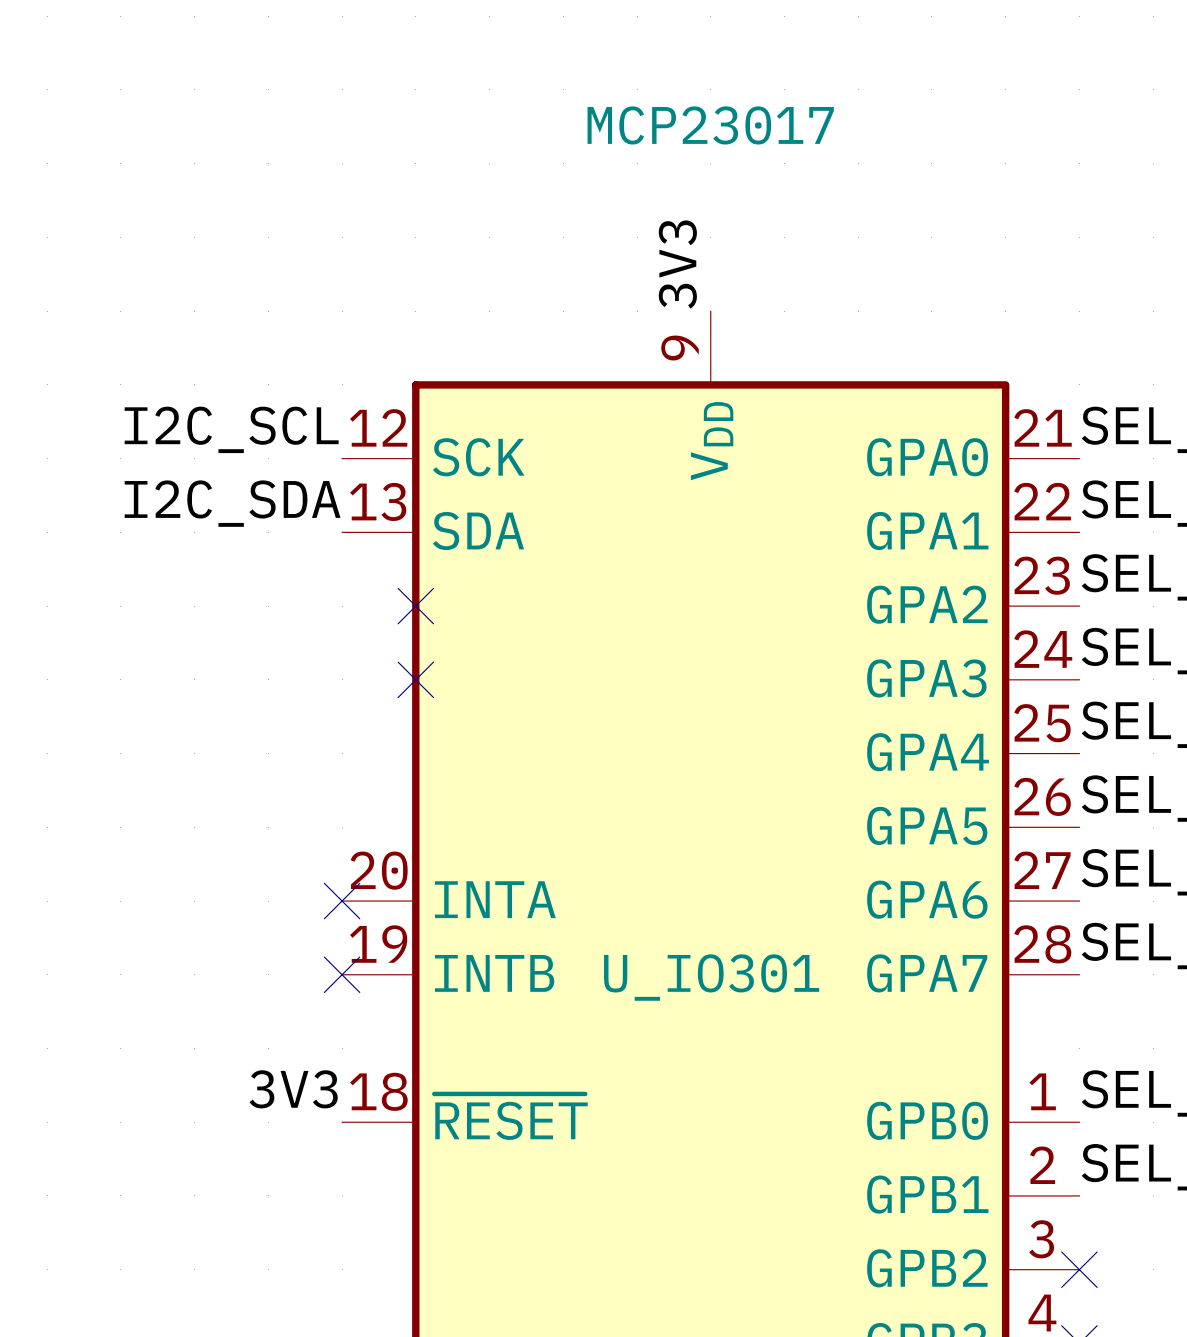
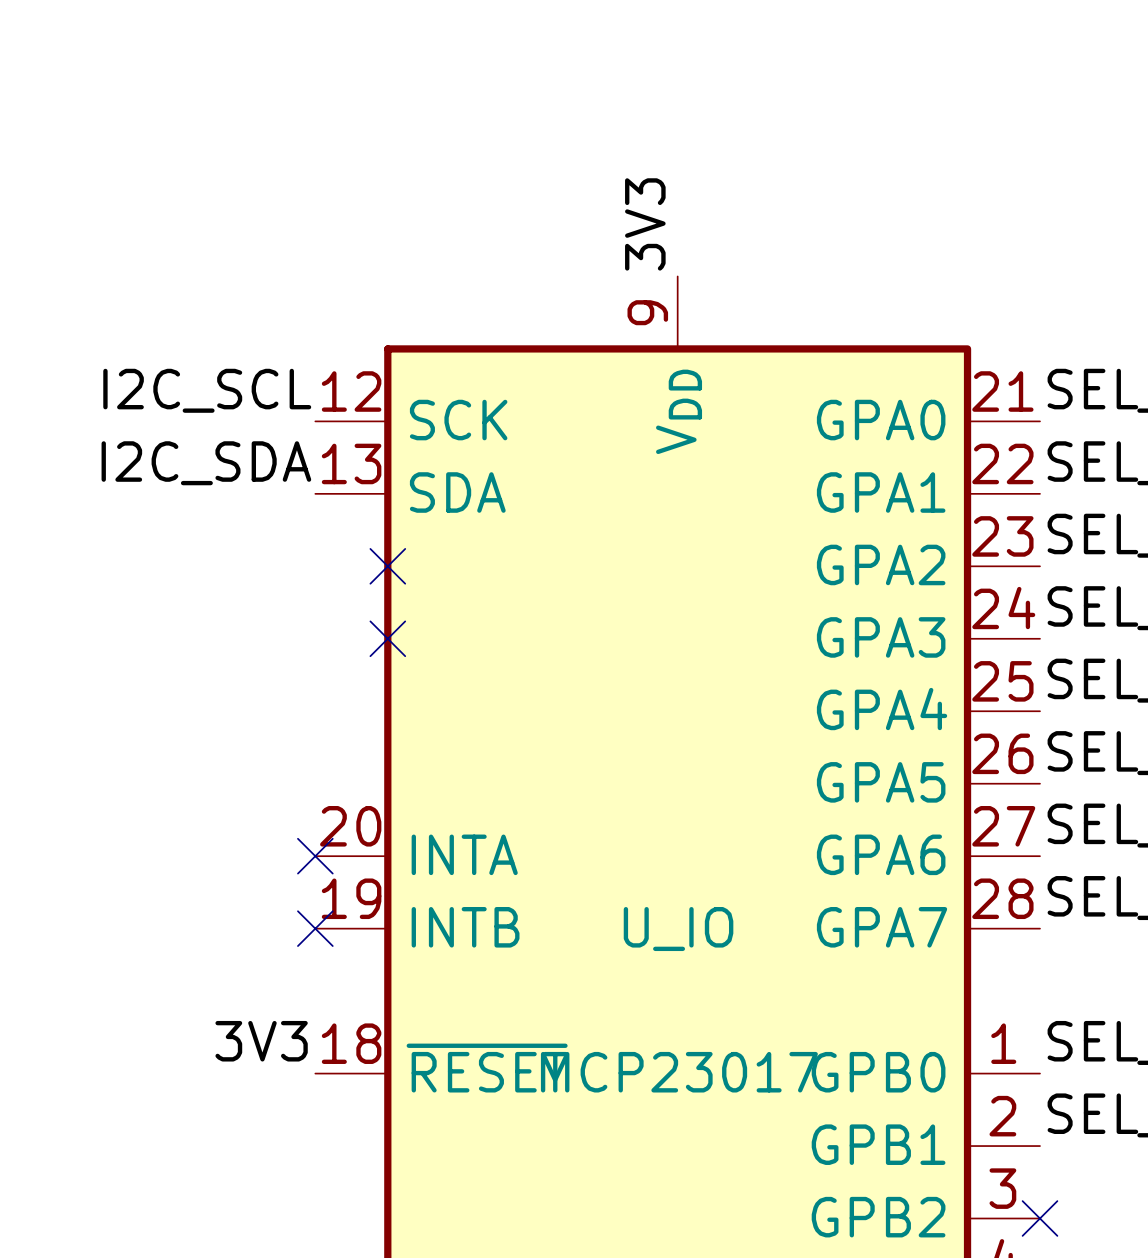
U_IO301 value position: MCP23017 (710, 125) -> MCP23017 (679, 1072)
U_IO301 name: U_IO301 (711, 977) -> U_IO (678, 929)

